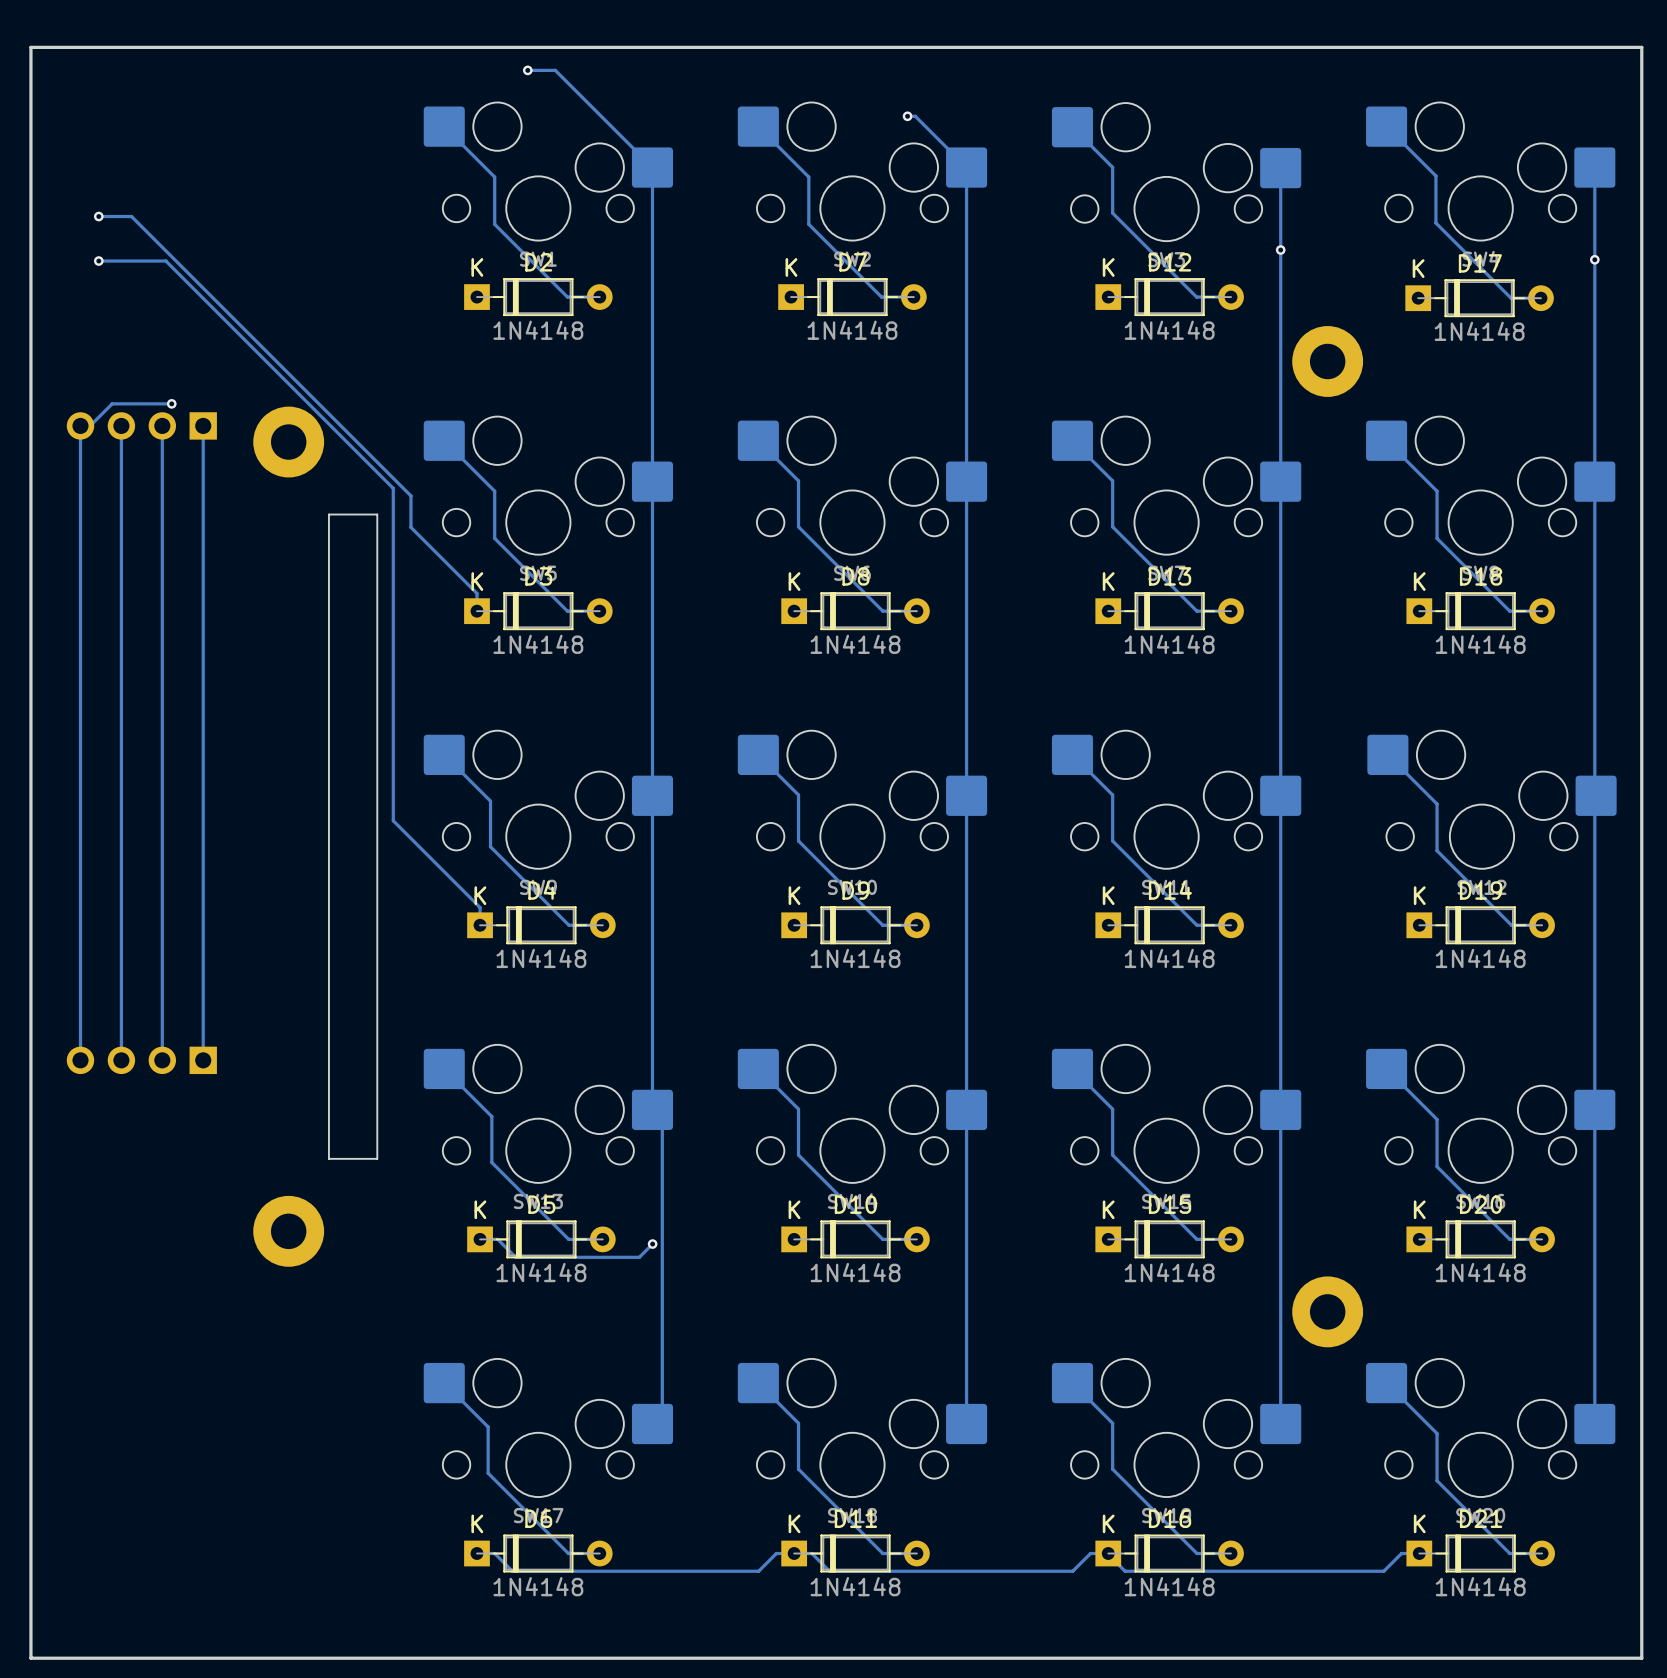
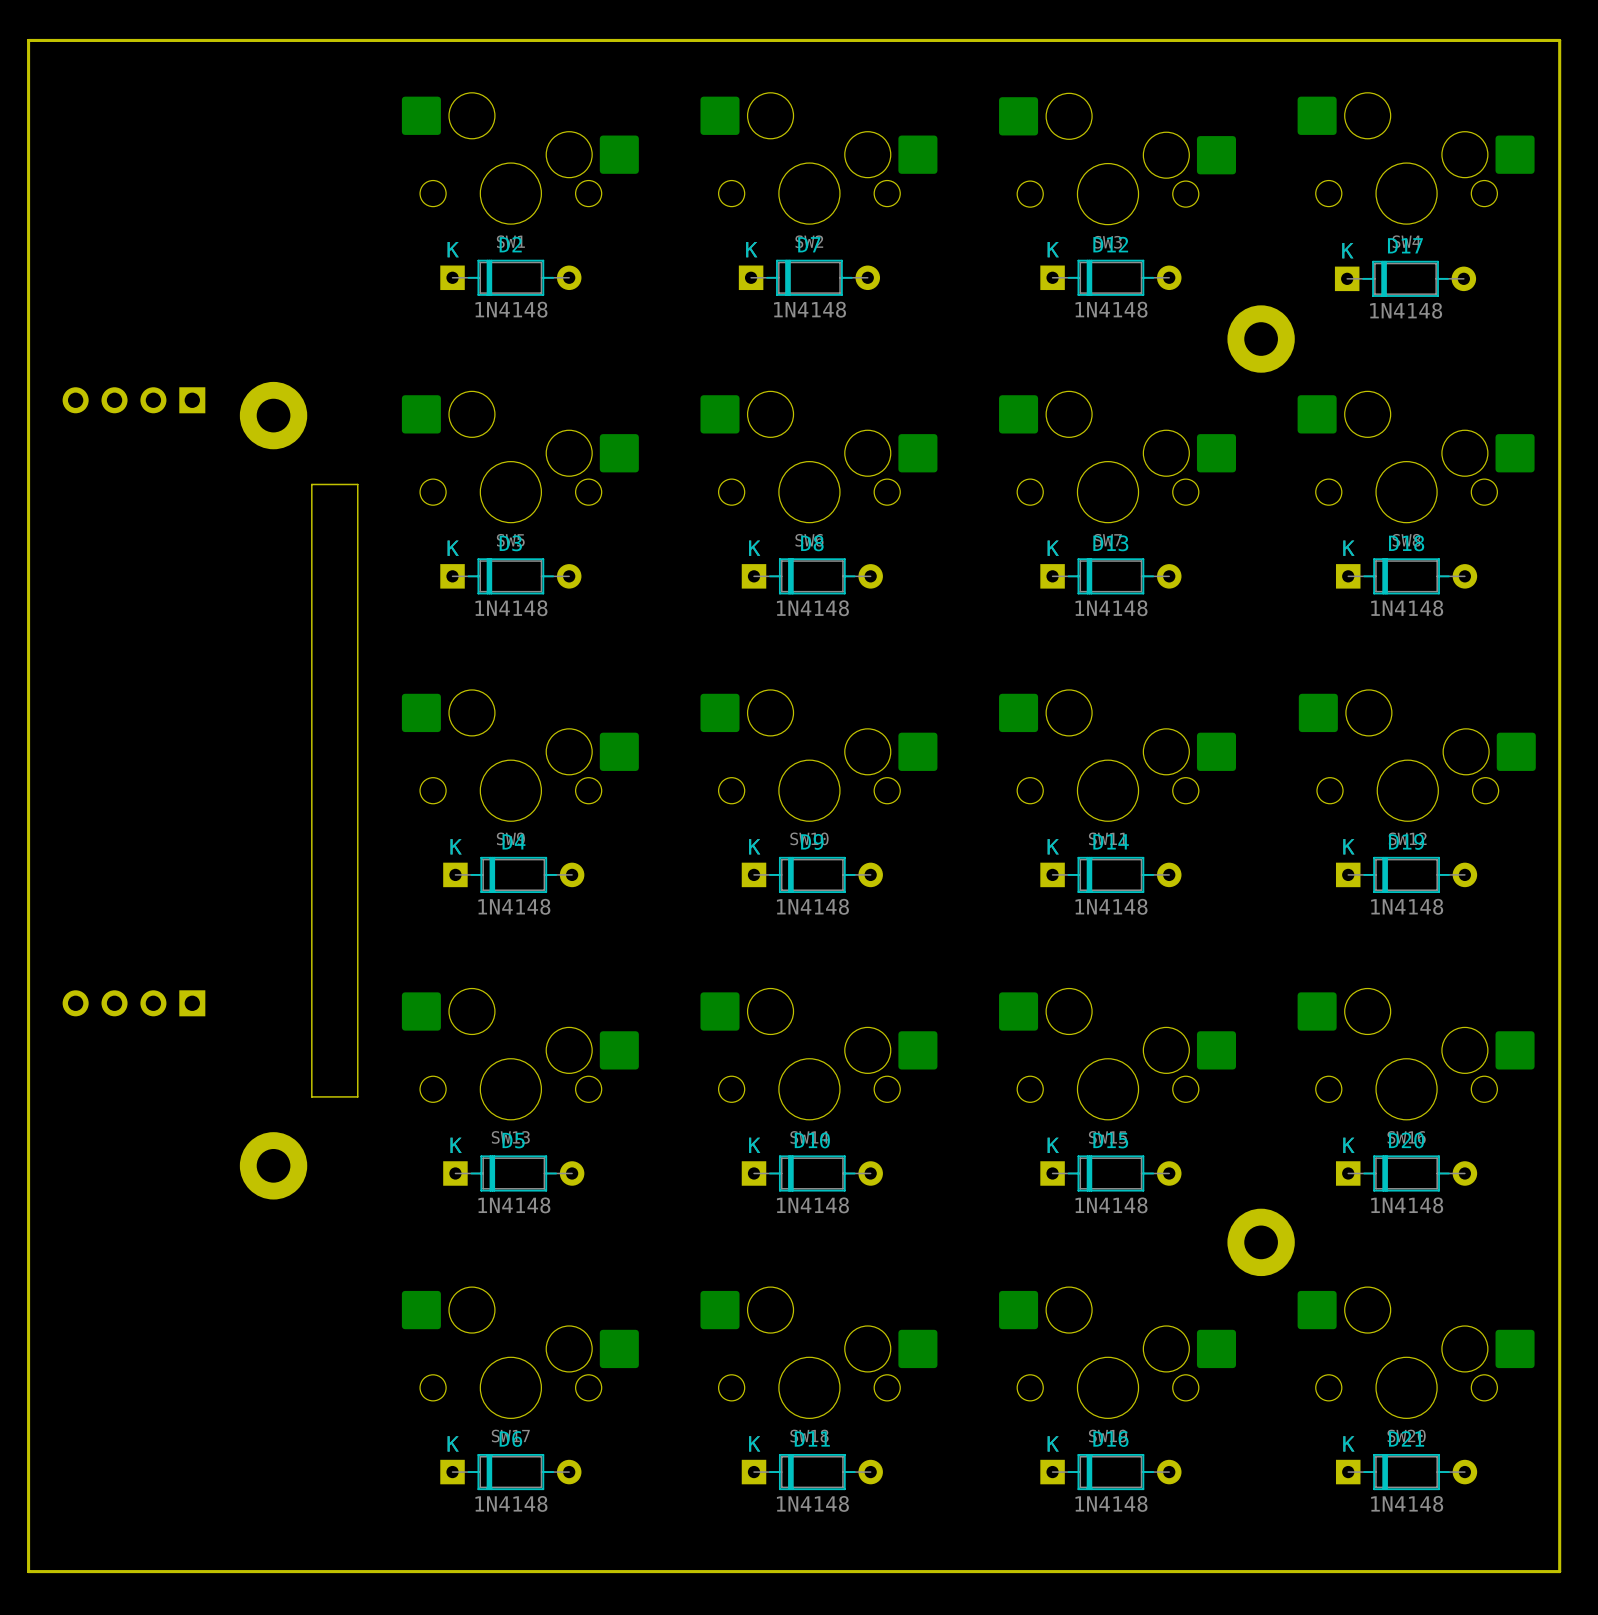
track: (527, 70) (555, 70) (652, 167) (652, 1109) (662, 1119) (662, 1414) (652, 1423) -> none
via: (527, 70) -> none
track: (907, 116) (915, 116) (966, 167) (966, 1423) -> none
via: (907, 116) -> none
track: (444, 126) (494, 177) (494, 224) (567, 297) (599, 297) -> none
track: (758, 126) (808, 177) (808, 224) (881, 297) (913, 297) -> none
track: (1386, 126) (1435, 175) (1435, 223) (1511, 298) (1540, 298) -> none
track: (1072, 127) (1112, 167) (1112, 213) (1196, 297) (1231, 297) -> none
track: (1594, 167) (1594, 1423) -> none
track: (1280, 168) (1280, 1423) -> none
track: (98, 216) (131, 216) (410, 495) (410, 527) (476, 593) (476, 611) -> none
via: (98, 216) -> none
via: (1280, 250) -> none
via: (1594, 259) -> none
track: (98, 261) (165, 261) (393, 488) (393, 820) (480, 907) (480, 925) -> none
via: (98, 261) -> none
track: (171, 403) (112, 403) (80, 435) -> none
via: (171, 403) -> none
track: (80, 425) (80, 1060) -> none
track: (121, 425) (121, 1060) -> none
track: (162, 425) (162, 1060) -> none
track: (203, 425) (203, 1060) -> none
track: (444, 440) (494, 491) (494, 538) (567, 611) (599, 611) -> none
track: (758, 440) (798, 480) (798, 526) (882, 611) (916, 611) -> none
track: (1072, 440) (1112, 480) (1112, 526) (1196, 611) (1231, 611) -> none
track: (1386, 440) (1437, 491) (1437, 538) (1509, 611) (1542, 611) -> none
track: (444, 754) (490, 801) (490, 846) (568, 925) (602, 925) -> none
track: (758, 754) (798, 795) (798, 841) (882, 925) (916, 925) -> none
track: (1072, 754) (1112, 795) (1112, 841) (1196, 925) (1231, 925) -> none
track: (1387, 754) (1437, 804) (1437, 850) (1511, 925) (1542, 925) -> none
track: (444, 1068) (491, 1116) (491, 1162) (568, 1239) (602, 1239) -> none
track: (758, 1068) (798, 1109) (798, 1155) (882, 1239) (916, 1239) -> none
track: (1072, 1068) (1112, 1109) (1112, 1155) (1196, 1239) (1231, 1239) -> none
track: (1386, 1068) (1437, 1119) (1437, 1166) (1509, 1239) (1542, 1239) -> none
track: (480, 1239) (497, 1239) (515, 1257) (639, 1257) (652, 1244) -> none
via: (652, 1244) -> none
track: (444, 1383) (488, 1426) (488, 1473) (568, 1553) (599, 1553) -> none
track: (758, 1383) (798, 1423) (798, 1469) (882, 1553) (916, 1553) -> none
track: (1072, 1383) (1112, 1423) (1112, 1469) (1196, 1553) (1231, 1553) -> none
track: (1386, 1383) (1437, 1433) (1437, 1480) (1509, 1553) (1542, 1553) -> none
track: (1108, 1553) (1090, 1553) (1072, 1571) (829, 1571) (811, 1553) (776, 1553) (758, 1571) (512, 1571) (494, 1553) (476, 1553) -> none
track: (1419, 1553) (1401, 1553) (1383, 1571) (1125, 1571) (1107, 1553) -> none

